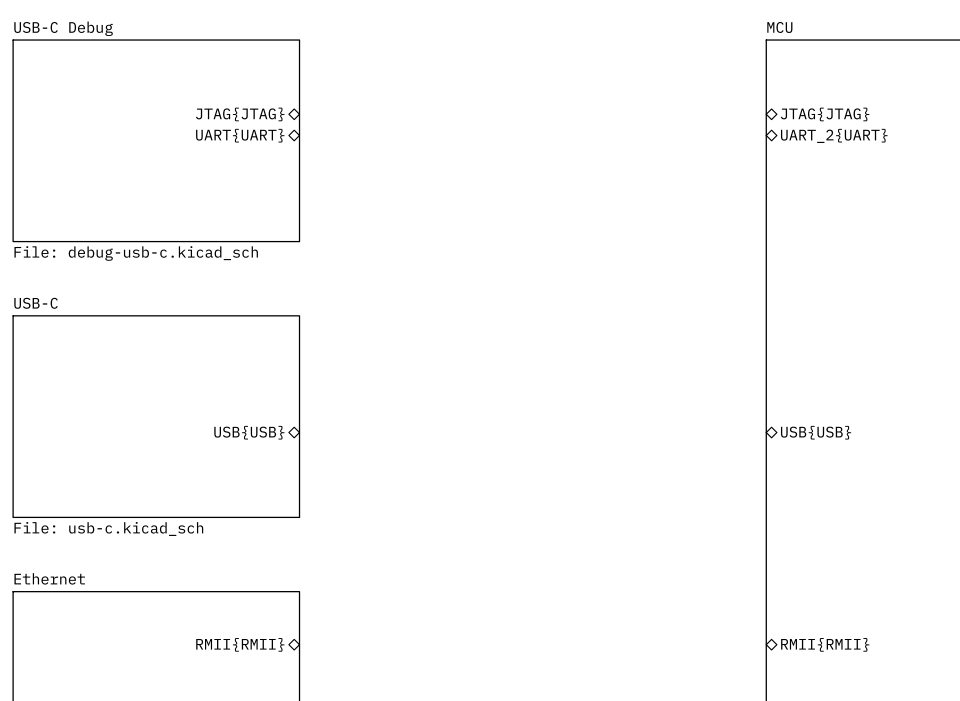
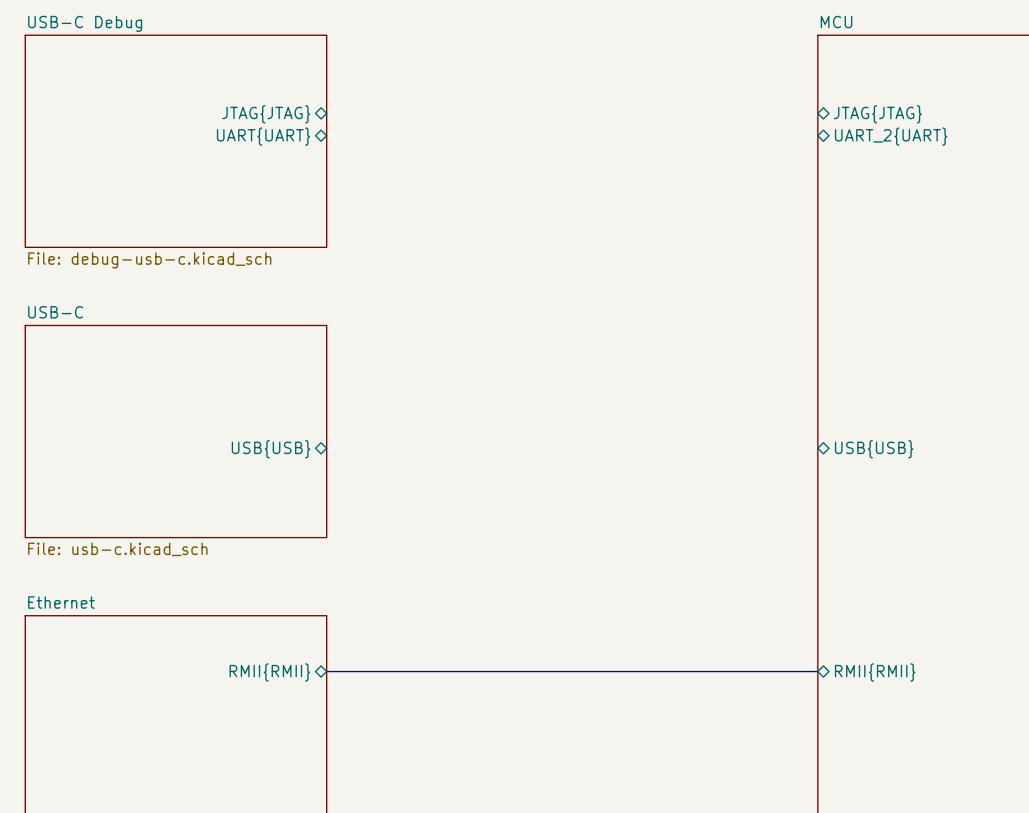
bus: none -> (326, 671) (817, 671)

